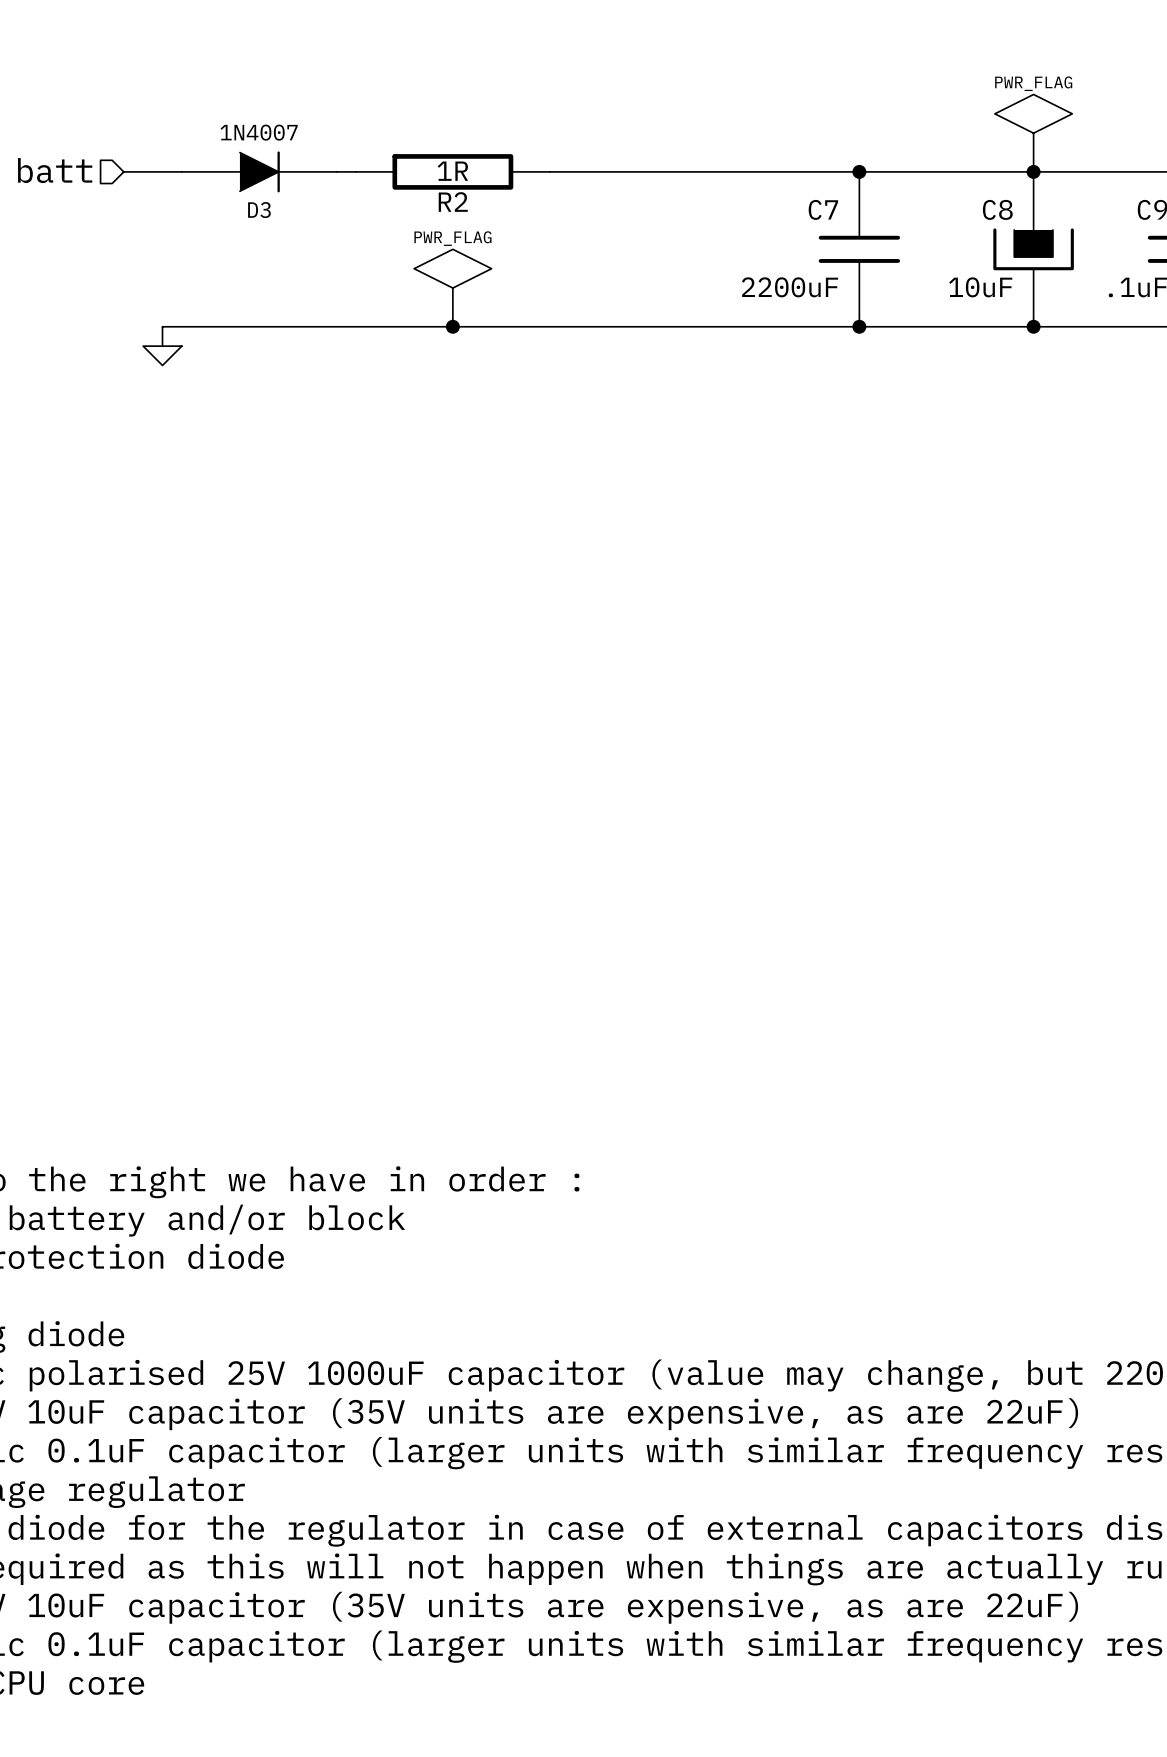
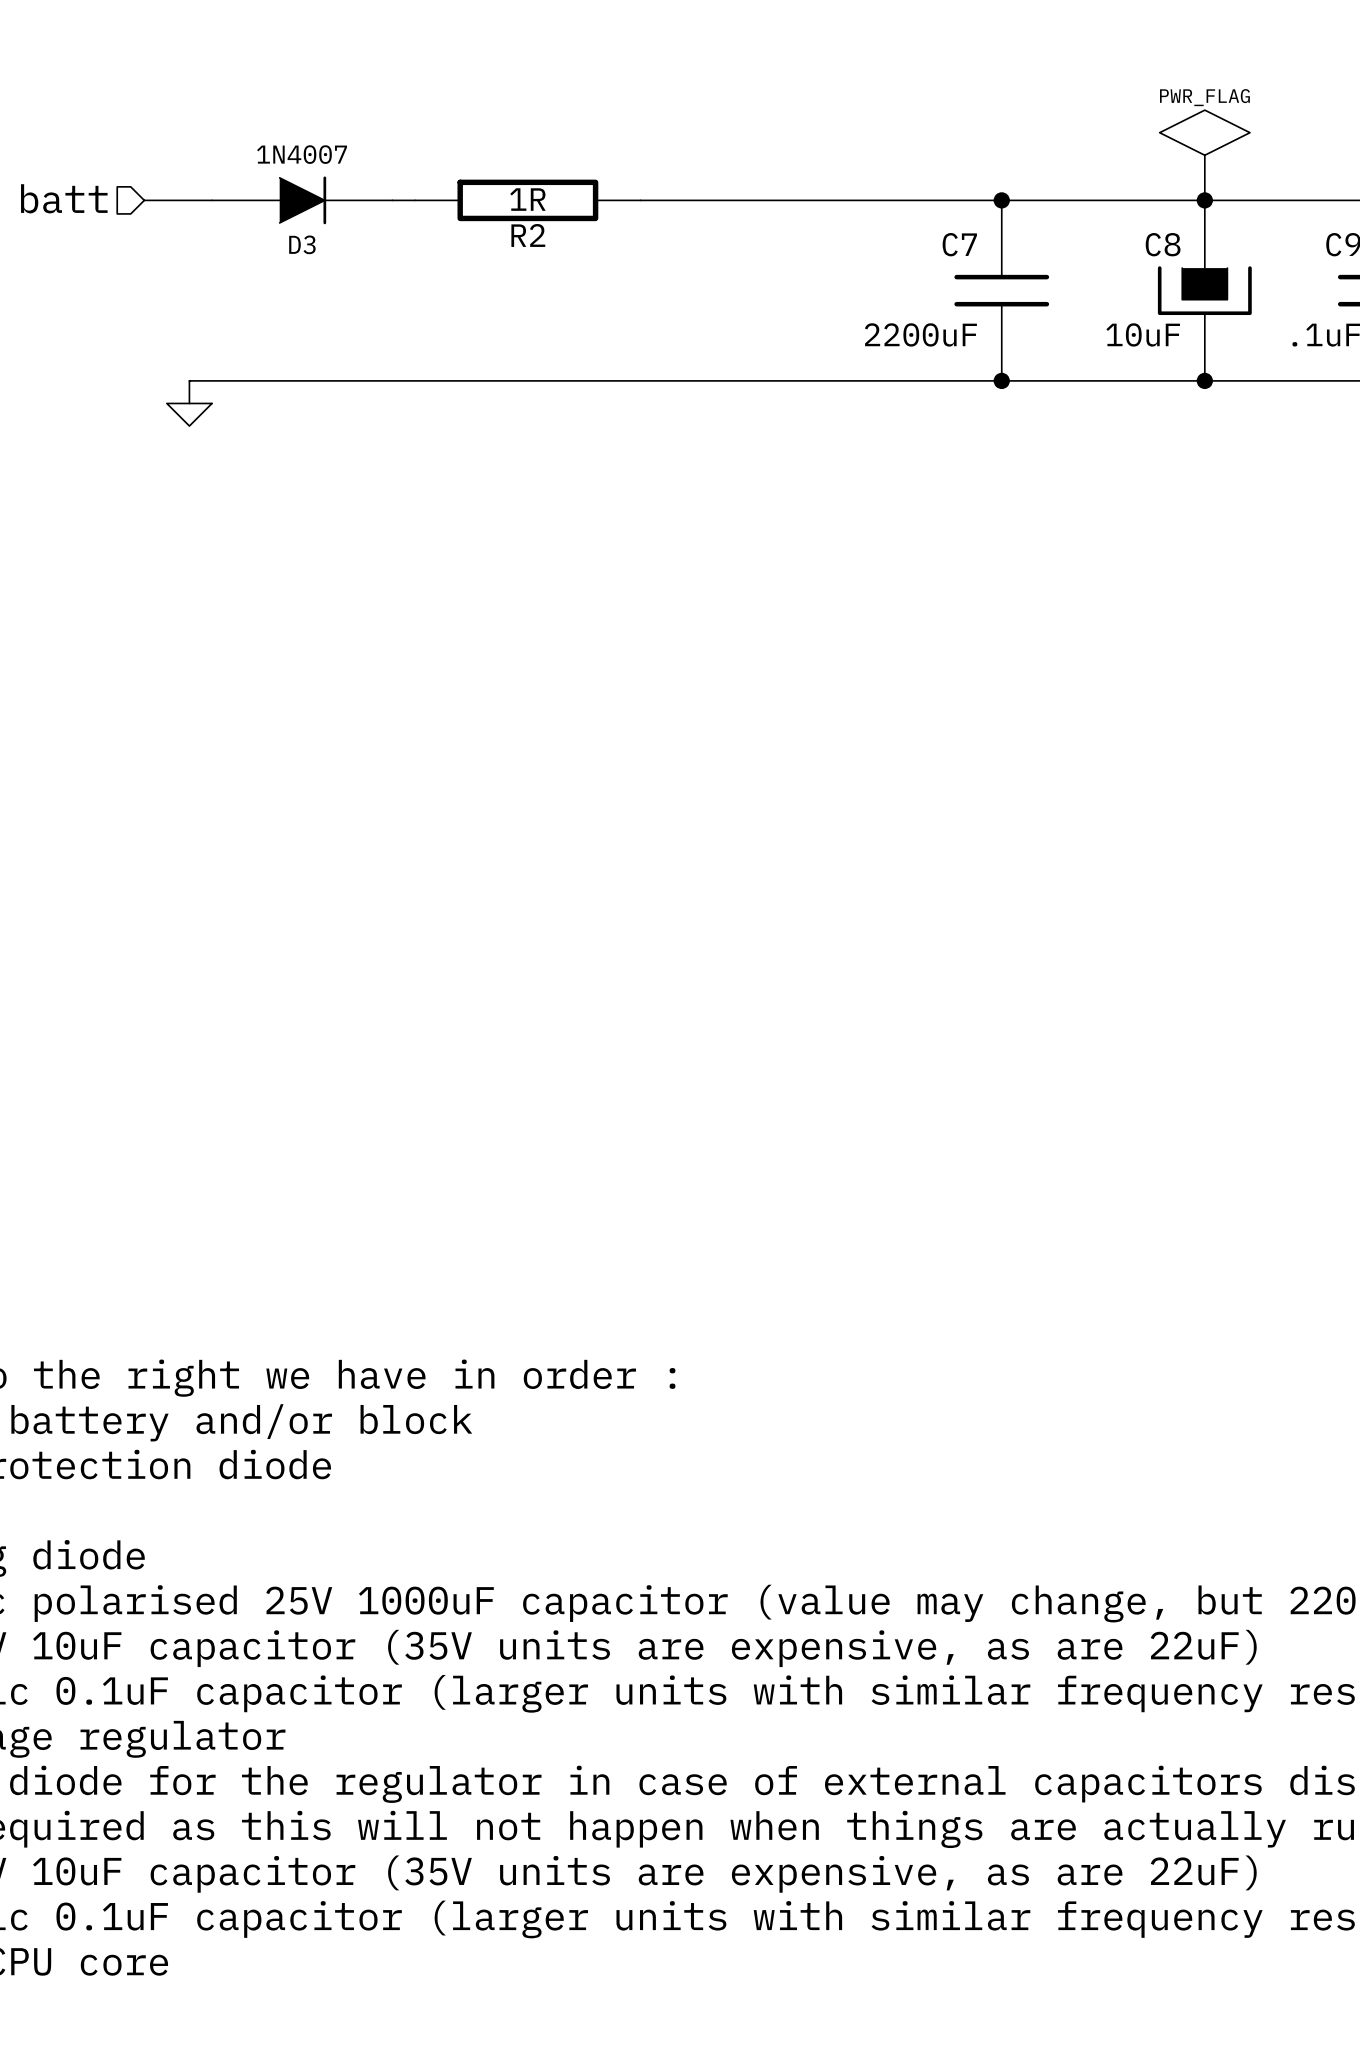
power symbol: PWR_FLAG (452, 288) -> none
junction: (452, 326) -> none

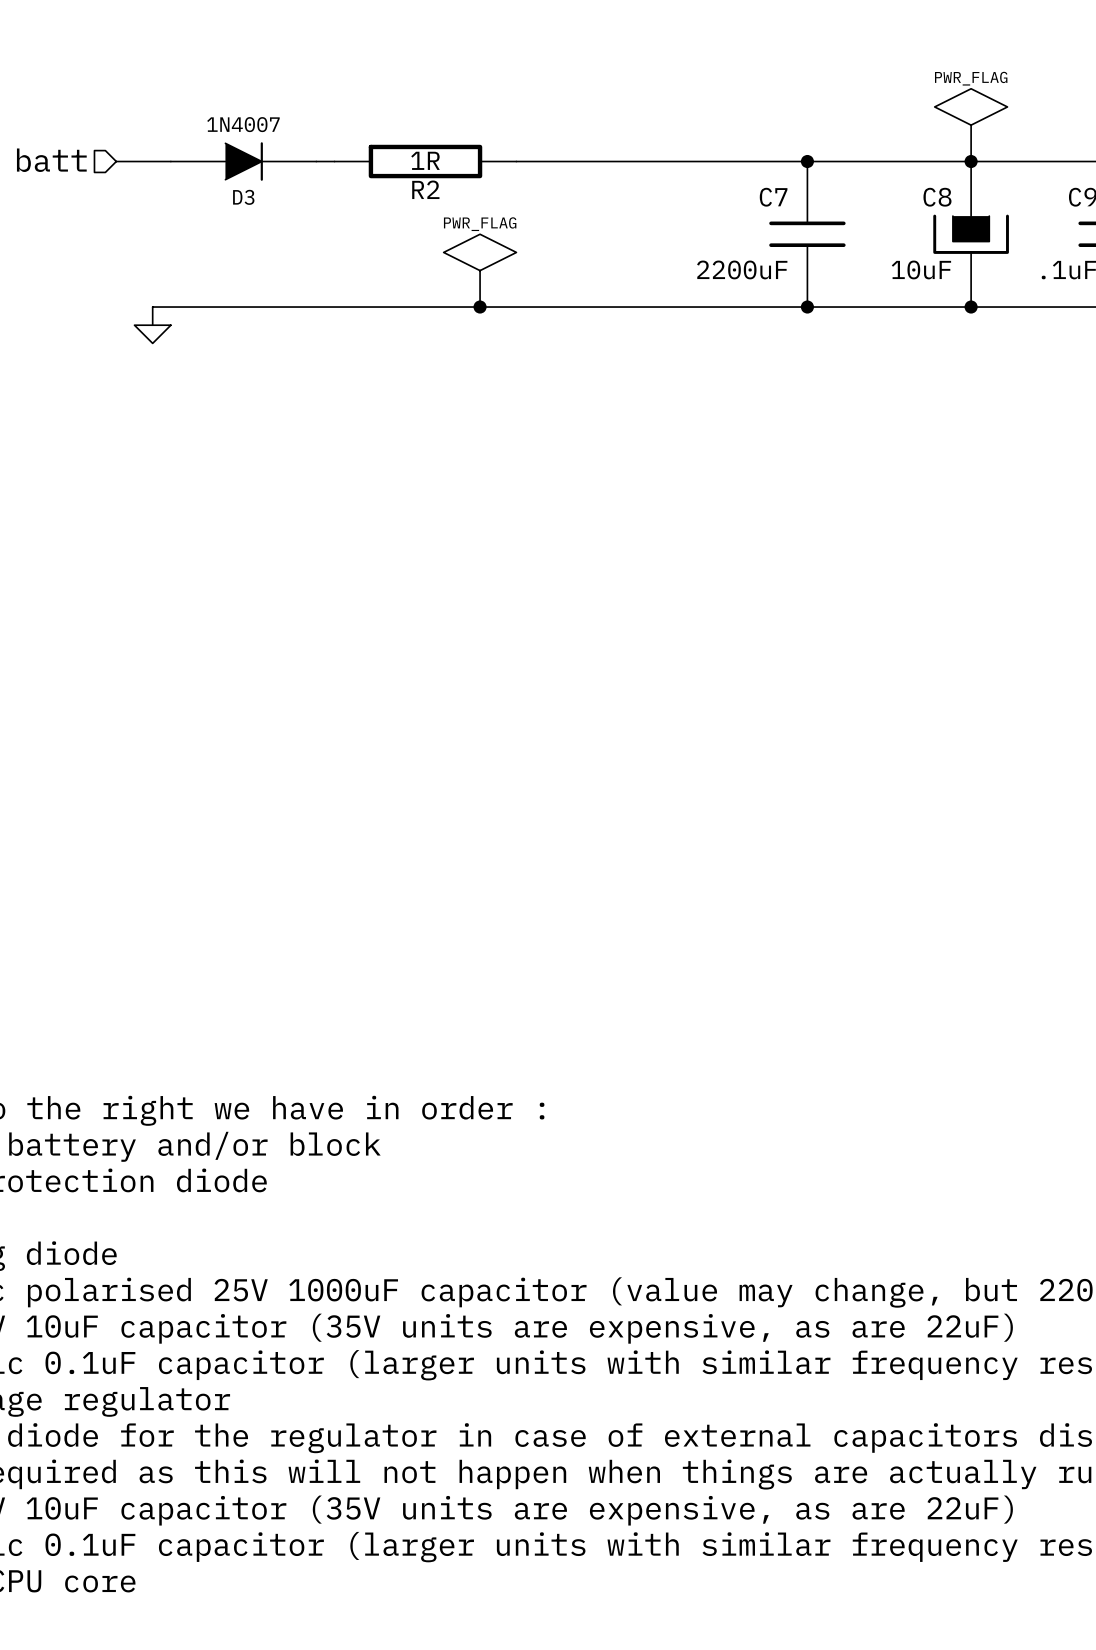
power symbol: none -> PWR_FLAG (480, 270)
junction: none -> (480, 307)

